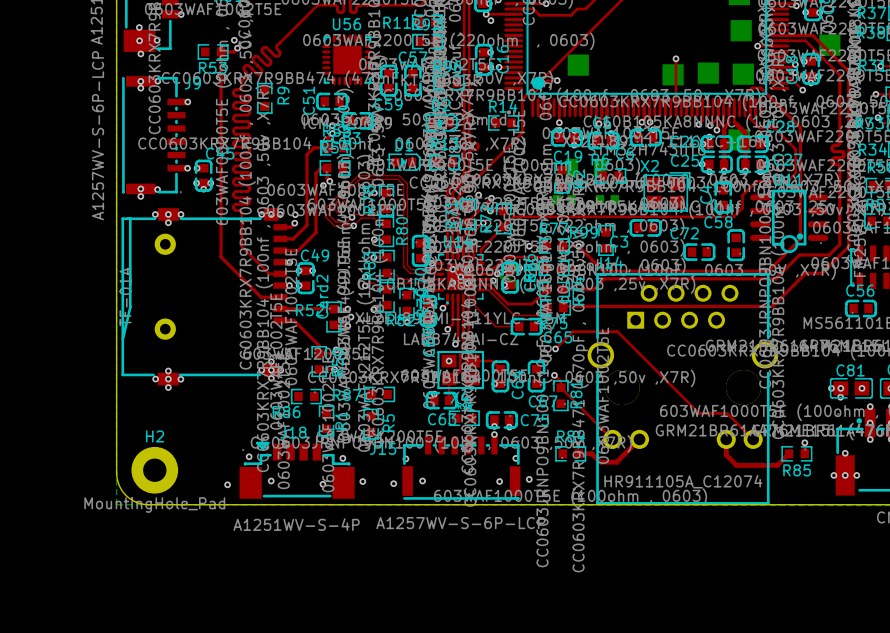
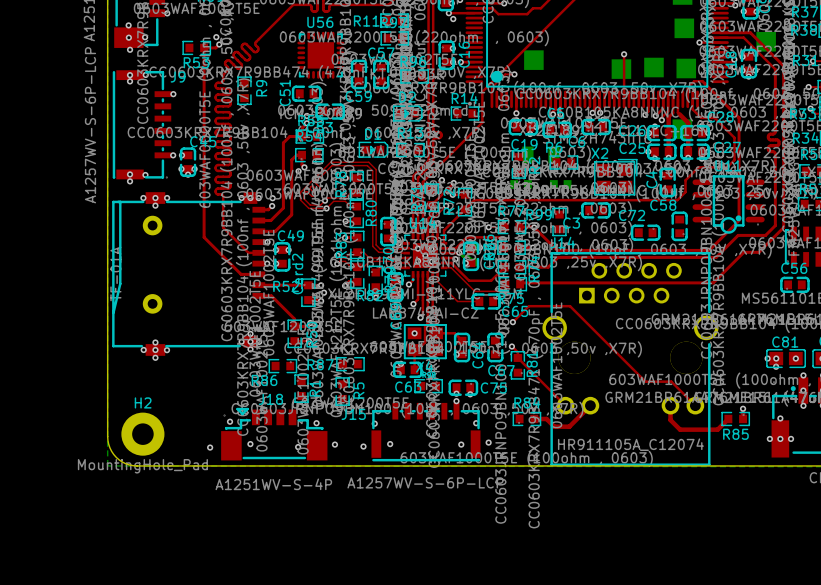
top track: (779, 77) (790, 77) (802, 90) -> none
via: (802, 90) -> none

